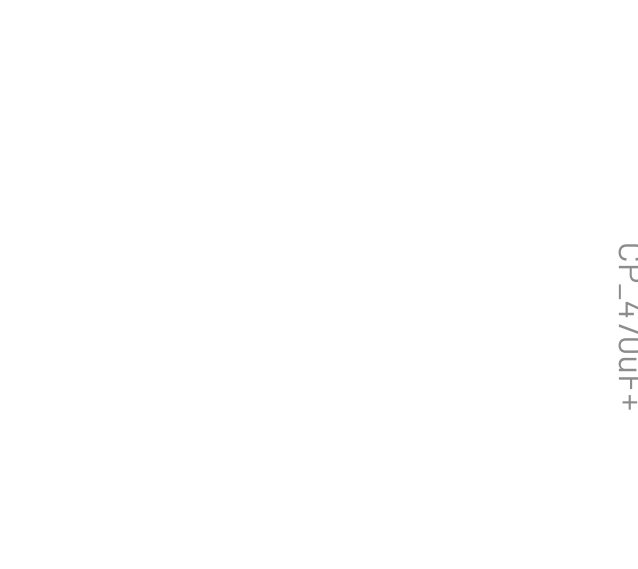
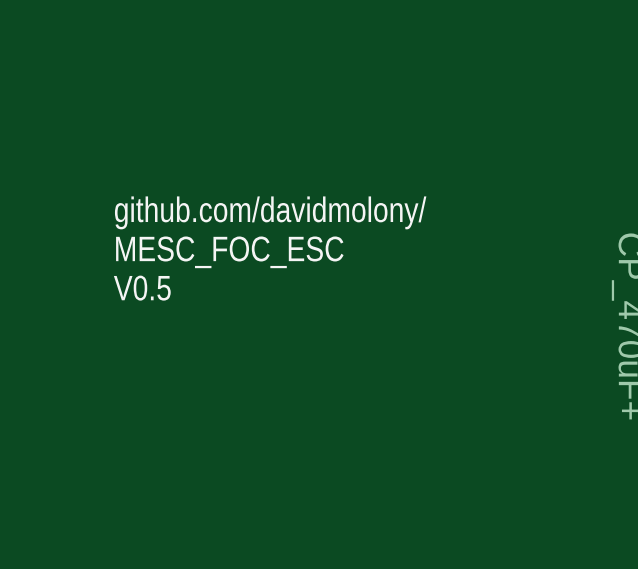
text: none -> github.com/davidmolony/ (270, 212)
text: none -> MESC_FOC_ESC (229, 252)
text: none -> V0.5 (142, 288)

